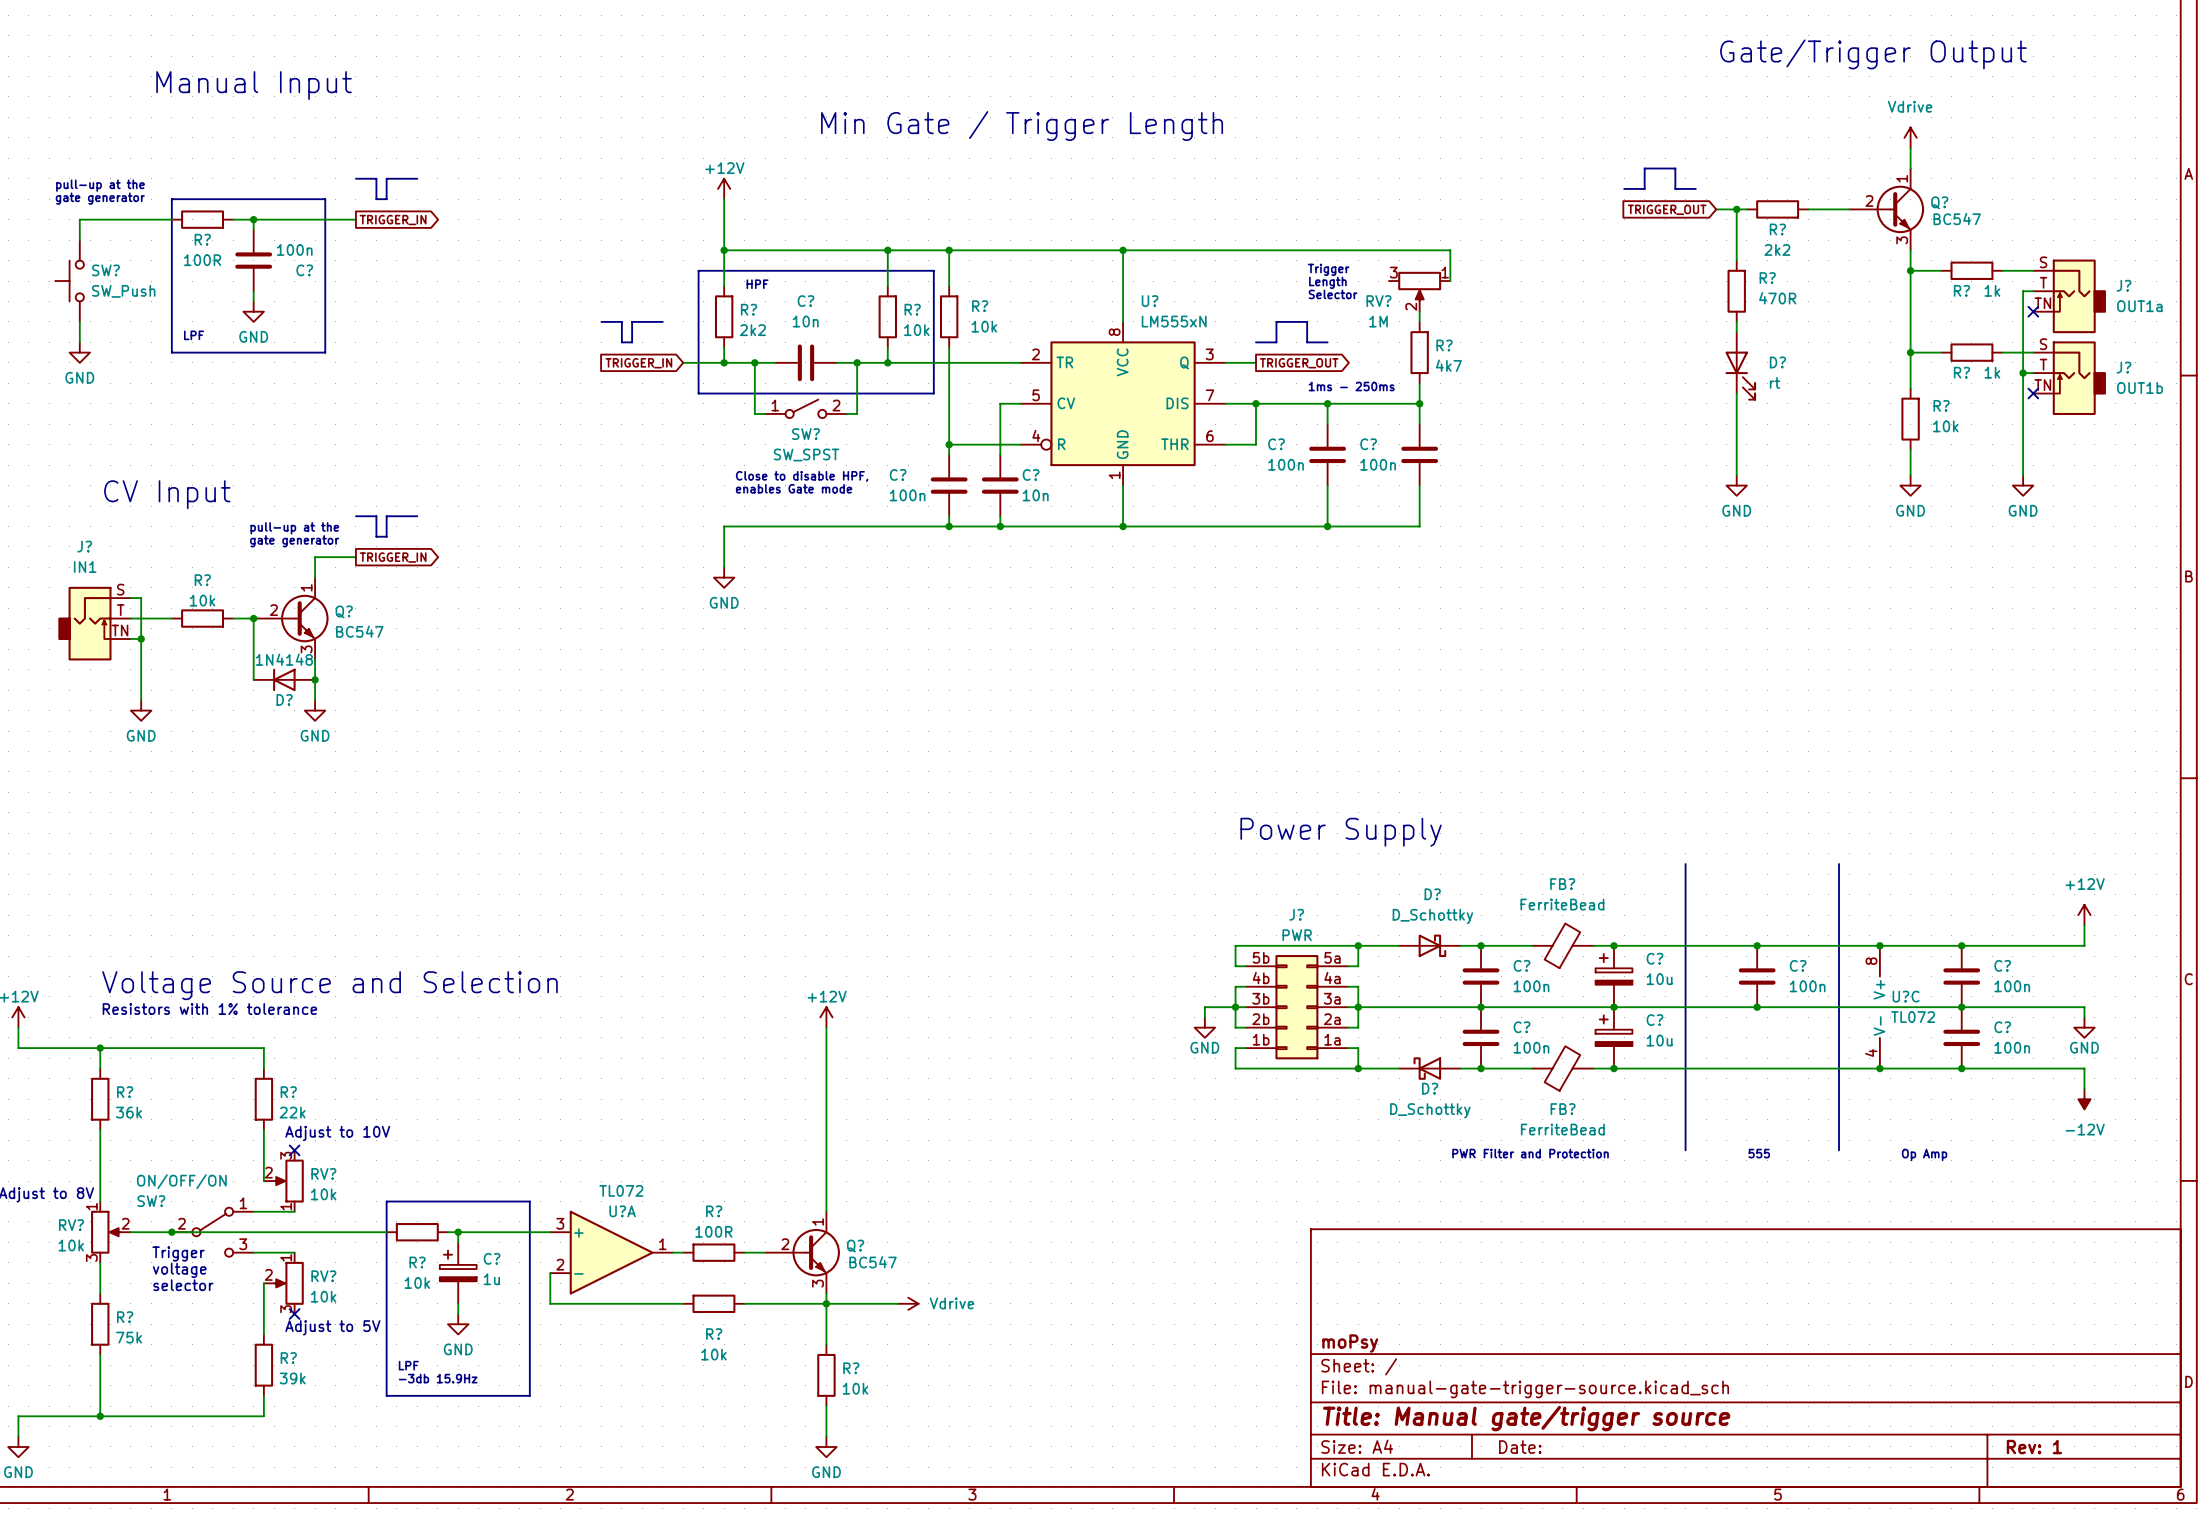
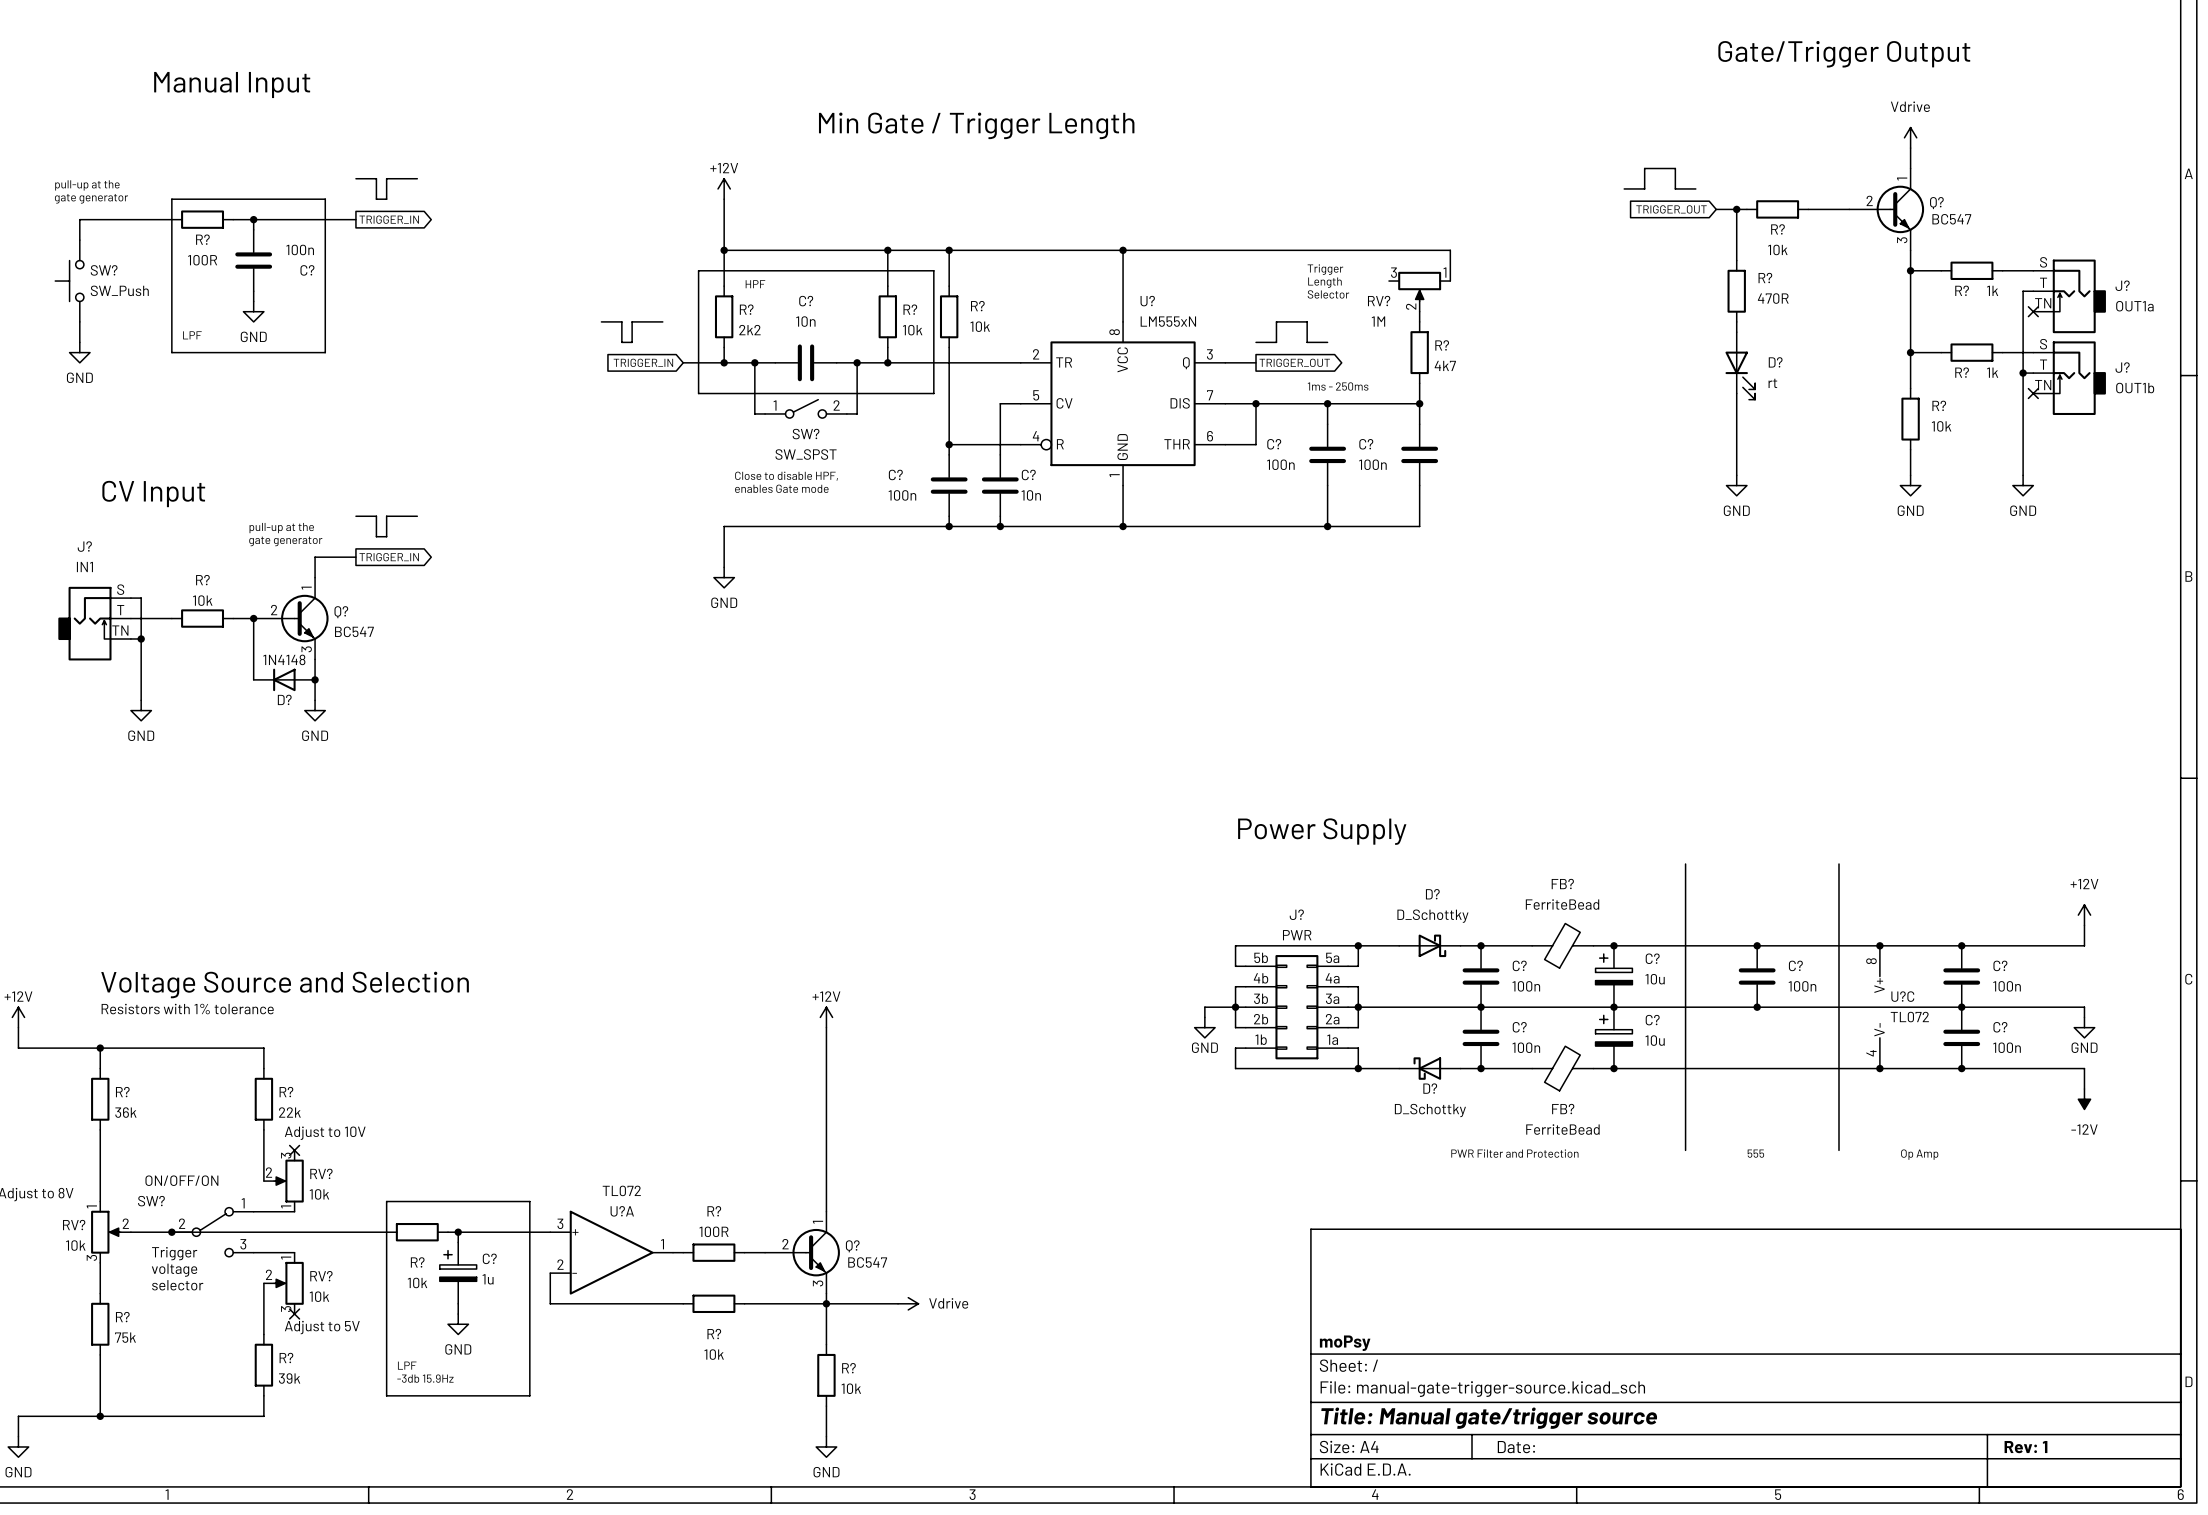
R? value: 2k2 (1777, 249) -> 10k (1777, 249)

